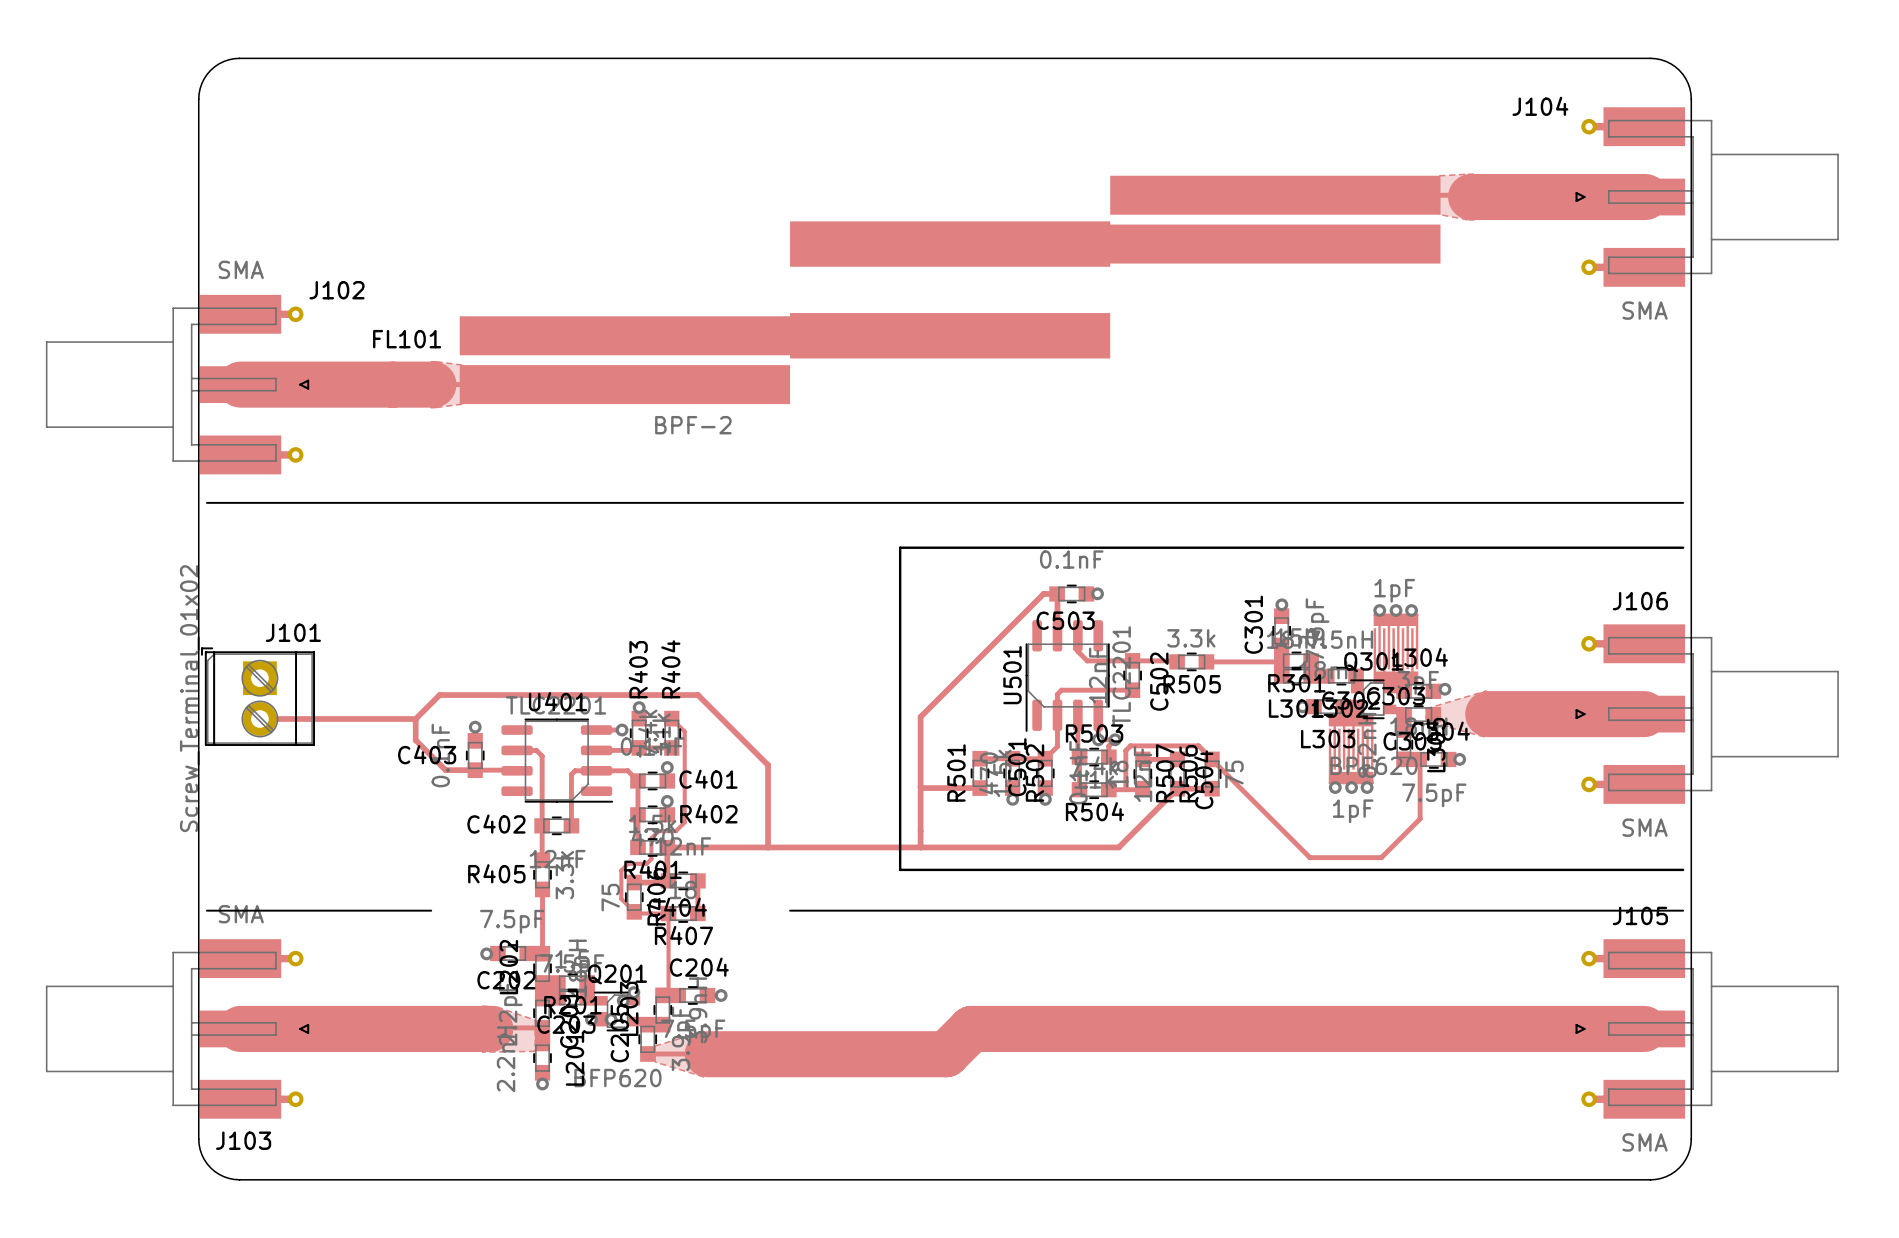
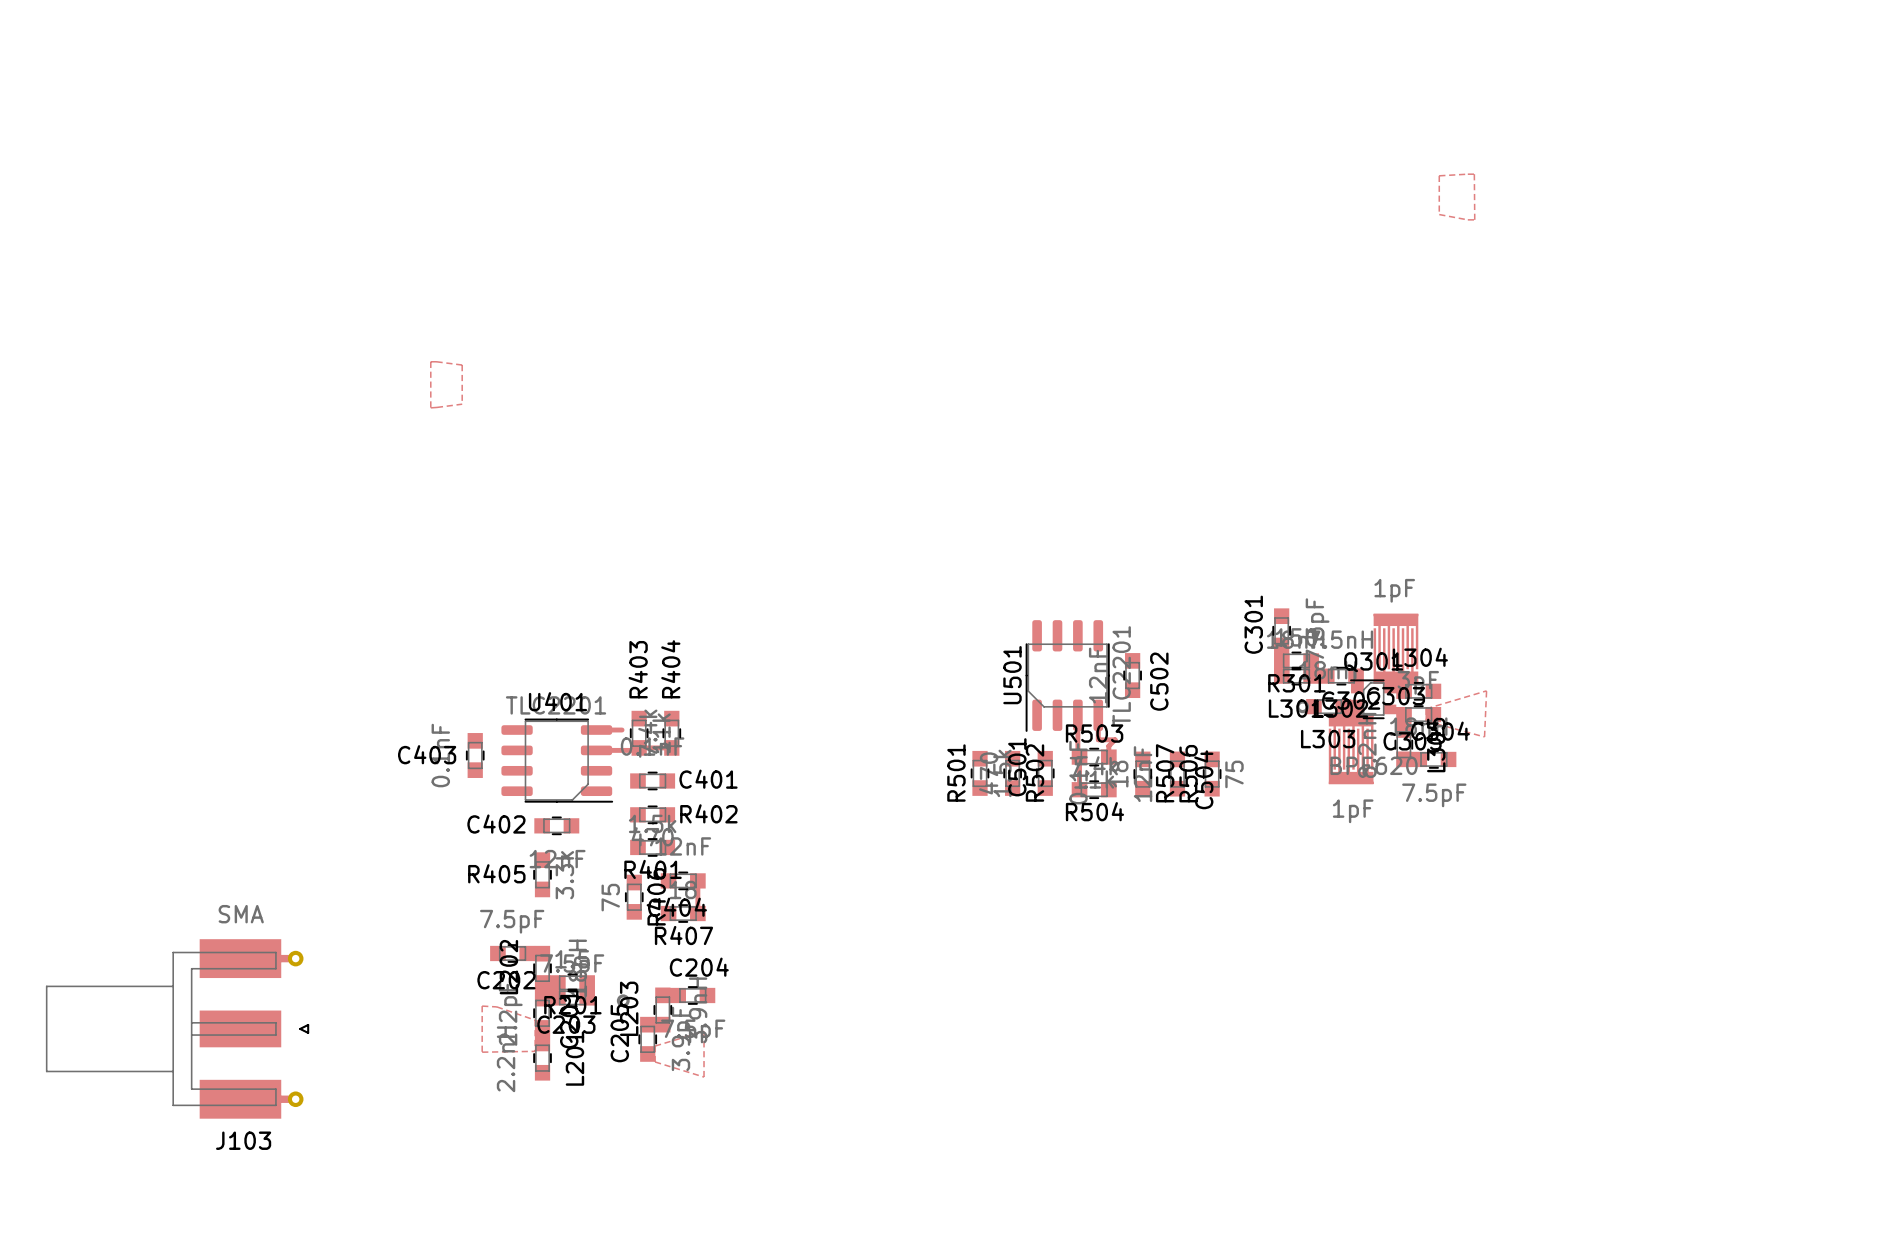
board edge: (239, 58) (1650, 58) (1666, 61) (1675, 66) (1685, 78) (1691, 99) (1691, 1139) (1688, 1154) (1682, 1163) (1666, 1176) (1650, 1179) (239, 1179) (228, 1178) (214, 1171) (201, 1154) (198, 1139) (198, 99) (201, 83) (210, 70) (223, 61) (239, 58) -> none
track: (1275, 195) (1645, 197) -> none
J104: SMA (1707, 197) -> none
FL101: BPF-2 (950, 289) -> none
J102: SMA (177, 384) -> none
track: (240, 384) (624, 384) -> none
line: (206, 502) (1683, 502) -> none
line: (1683, 547) (900, 547) (900, 869) (1683, 869) -> none
C503: 0.1nF (1071, 593) -> none
via: (1097, 593) -> none
via: (1281, 604) -> none
via: (1379, 610) -> none
via: (1396, 610) -> none
via: (1411, 610) -> none
track: (1057, 635) (1057, 594) (1043, 593) (920, 716) (920, 847) -> none
track: (1077, 635) (1077, 651) (1087, 660) (1177, 661) -> none
R505: 3.3k (1191, 661) -> none
track: (1206, 661) (1281, 660) (1281, 676) -> none
via: (1444, 689) -> none
track: (1132, 690) (1061, 690) (1057, 694) (1057, 746) (1045, 758) (980, 758) -> none
J101: Screw_Terminal_01x02 (257, 696) -> none
via: (639, 707) -> none
track: (1477, 714) (1644, 714) -> none
J106: SMA (1707, 714) -> none
track: (671, 718) (684, 731) (684, 822) (675, 831) (658, 831) (651, 838) (651, 859) (646, 863) (628, 863) (621, 870) (621, 898) (635, 913) (668, 913) -> none
track: (259, 719) (415, 719) -> none
track: (415, 719) (439, 695) (698, 695) (768, 765) (768, 847) -> none
track: (415, 719) (415, 740) (445, 770) (517, 770) -> none
via: (475, 727) -> none
via: (622, 730) -> none
via: (1098, 739) -> none
via: (1115, 739) -> none
track: (517, 750) (536, 750) (542, 756) (542, 860) -> none
track: (1142, 759) (1177, 759) -> none
track: (1403, 759) (1420, 760) (1420, 818) (1381, 857) (1310, 857) (1198, 745) (1130, 745) (1125, 750) (1125, 789) -> none
via: (1459, 759) -> none
via: (667, 767) -> none
track: (920, 786) (980, 788) -> none
via: (1335, 787) -> none
via: (1351, 787) -> none
via: (1367, 787) -> none
track: (1142, 788) (1108, 789) -> none
track: (1212, 788) (1177, 788) (1118, 847) (667, 847) (668, 880) (666, 882) (634, 882) -> none
via: (1012, 799) -> none
via: (1045, 799) -> none
via: (667, 801) -> none
track: (571, 825) (571, 774) (575, 770) (627, 770) (637, 780) (637, 847) -> none
track: (542, 889) (542, 953) -> none
line: (206, 910) (431, 910) -> none
line: (790, 910) (1683, 910) -> none
track: (668, 913) (668, 989) (662, 995) (678, 995) -> none
via: (486, 953) -> none
via: (633, 992) -> none
via: (721, 995) -> none
Q201: BFP620 (617, 1011) -> none
via: (591, 1019) -> none
via: (611, 1019) -> none
track: (240, 1028) (542, 1027) (542, 1043) -> none
track: (1644, 1028) (971, 1028) (946, 1054) (686, 1054) -> none
J105: SMA (1707, 1028) -> none
track: (647, 1053) (688, 1054) -> none
via: (542, 1083) -> none

